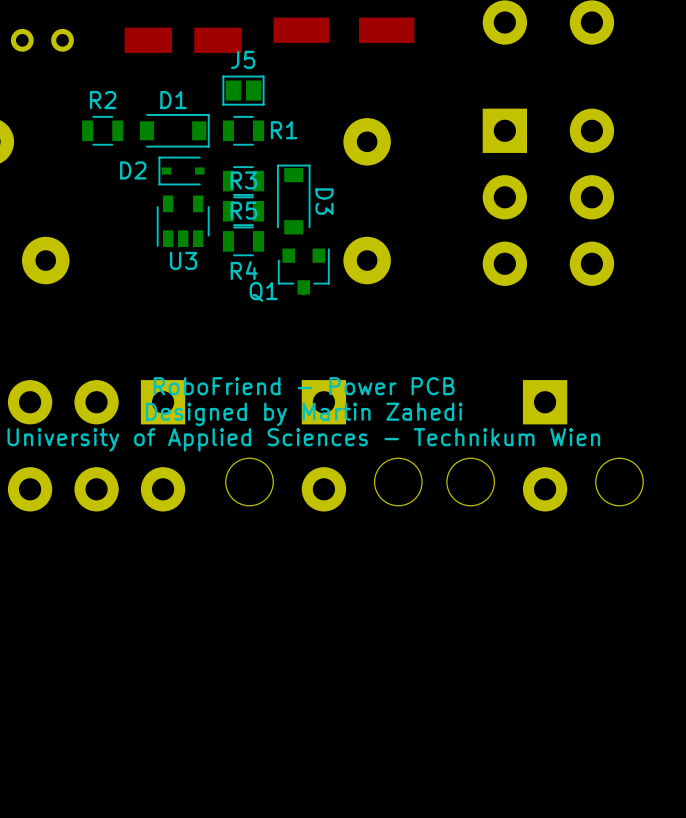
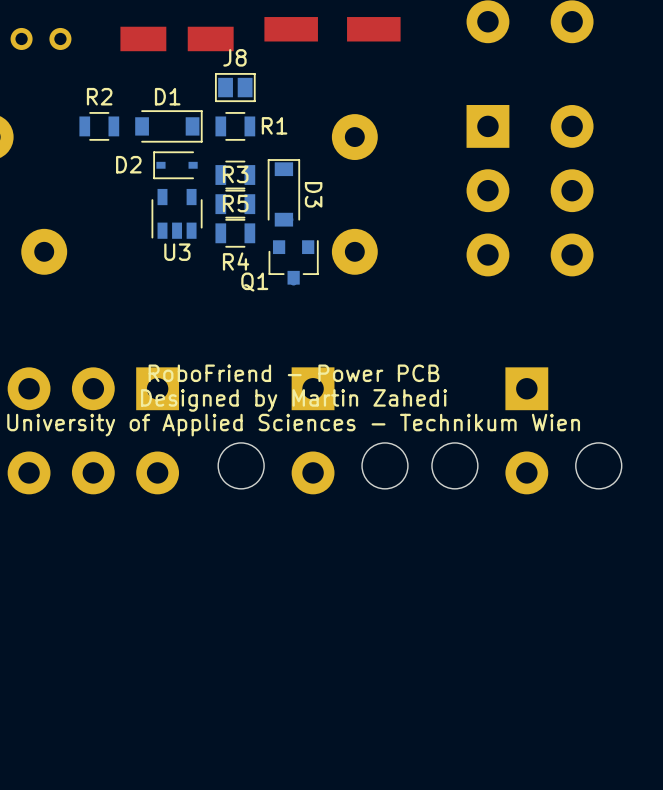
J5 name: J5 (243, 59) -> J8 (234, 57)

